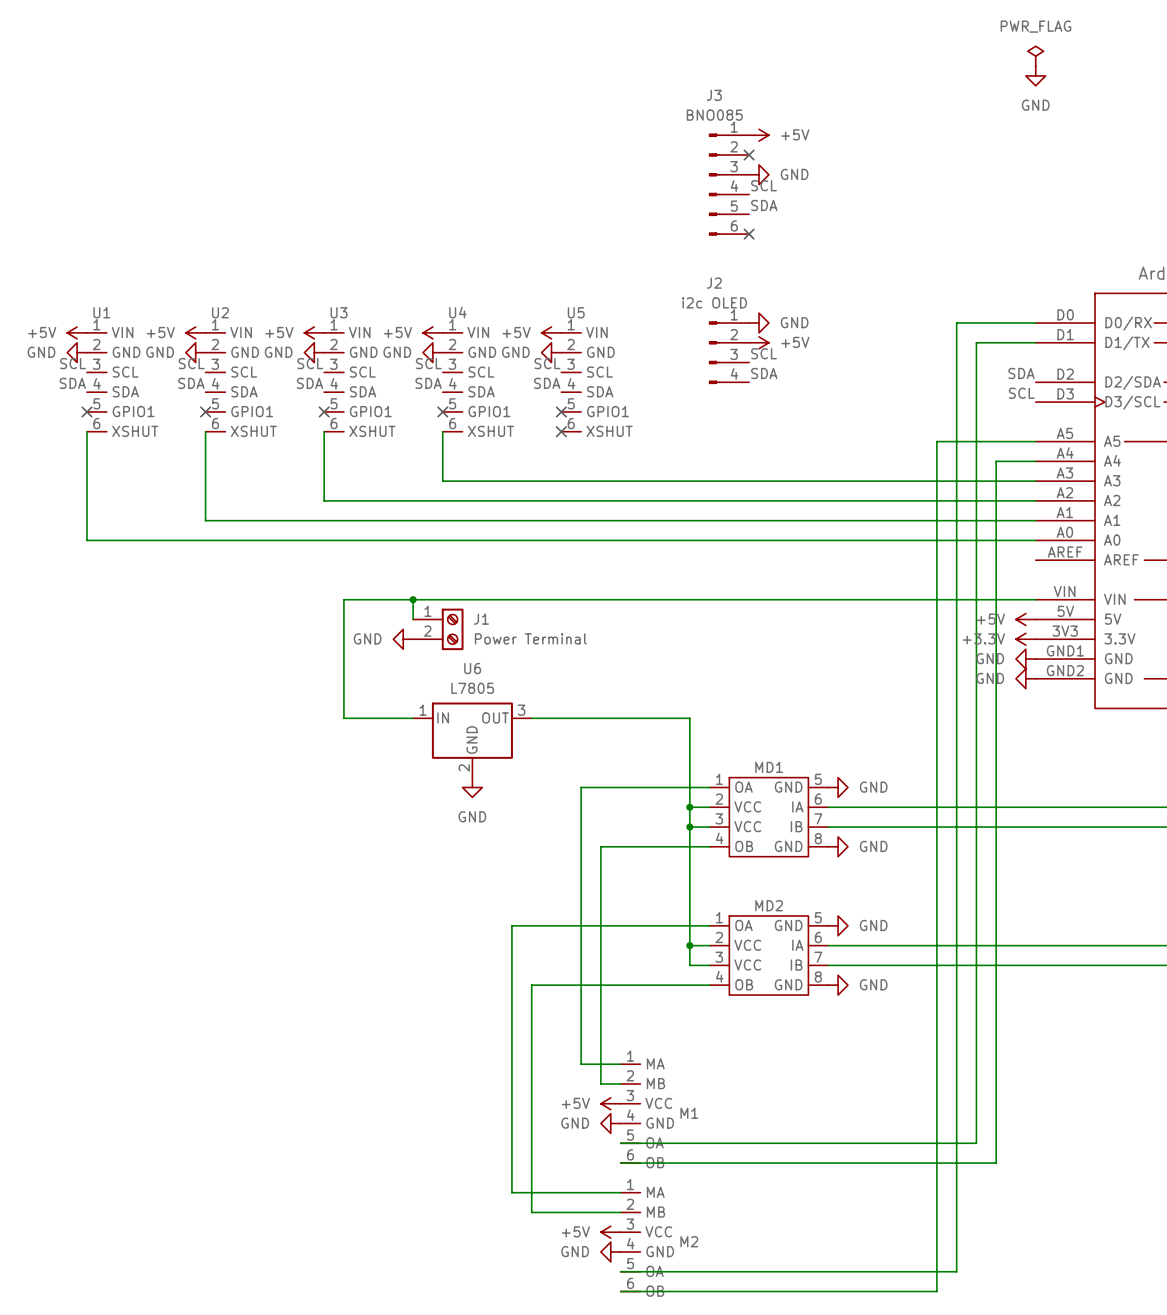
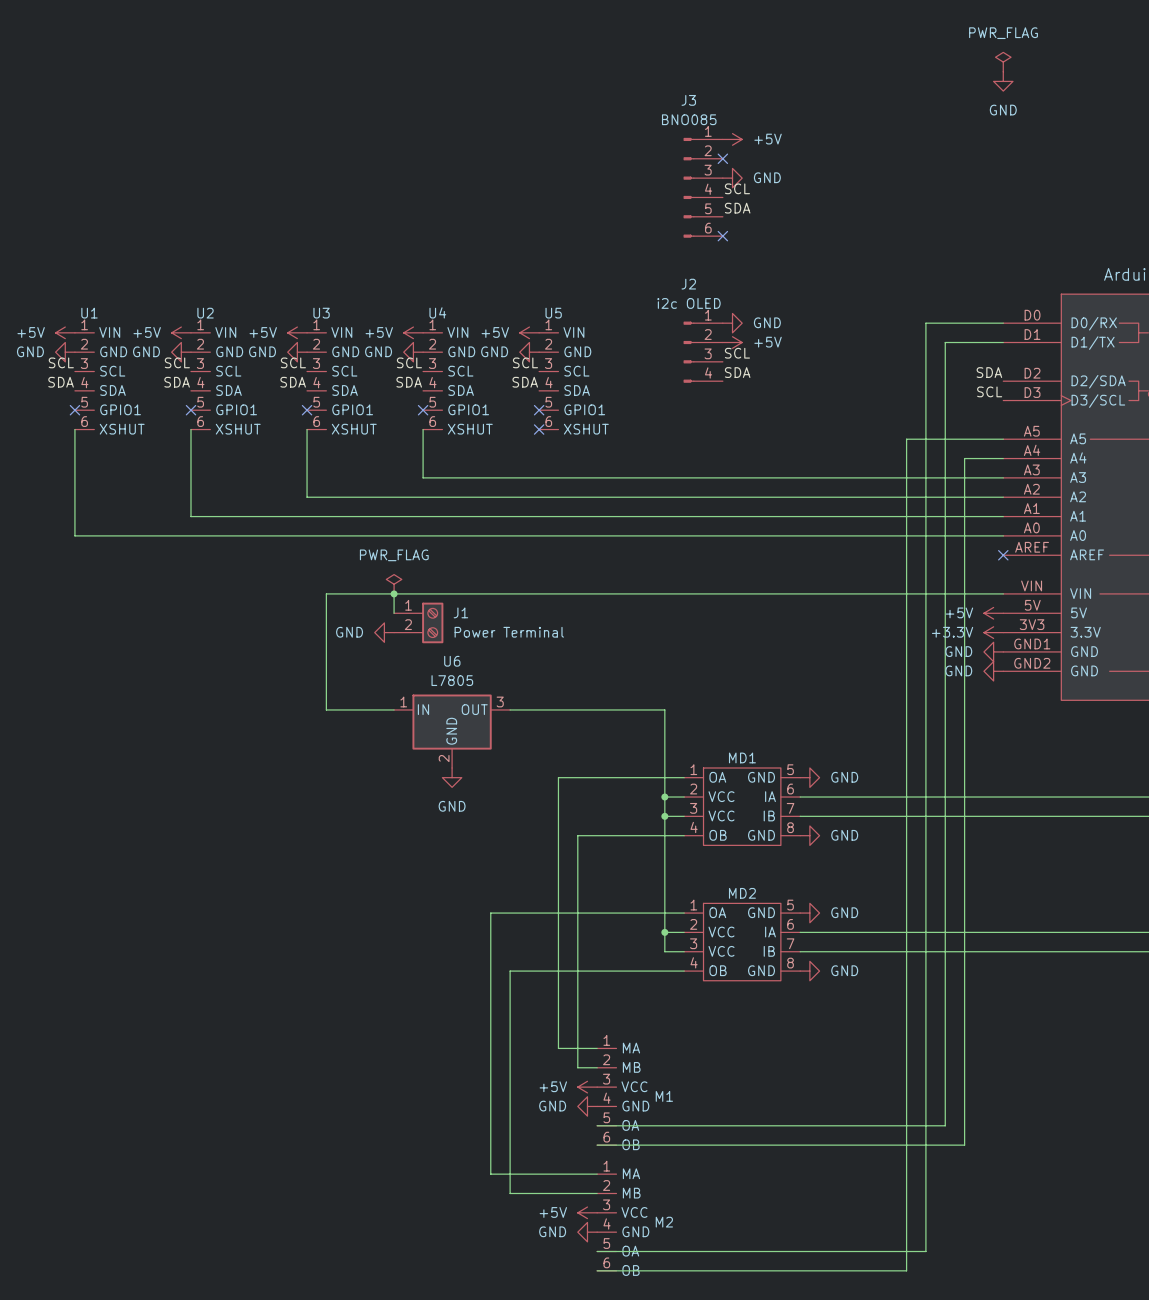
no-connect mark: none -> (1003, 555)
power symbol: none -> PWR_FLAG (394, 584)

